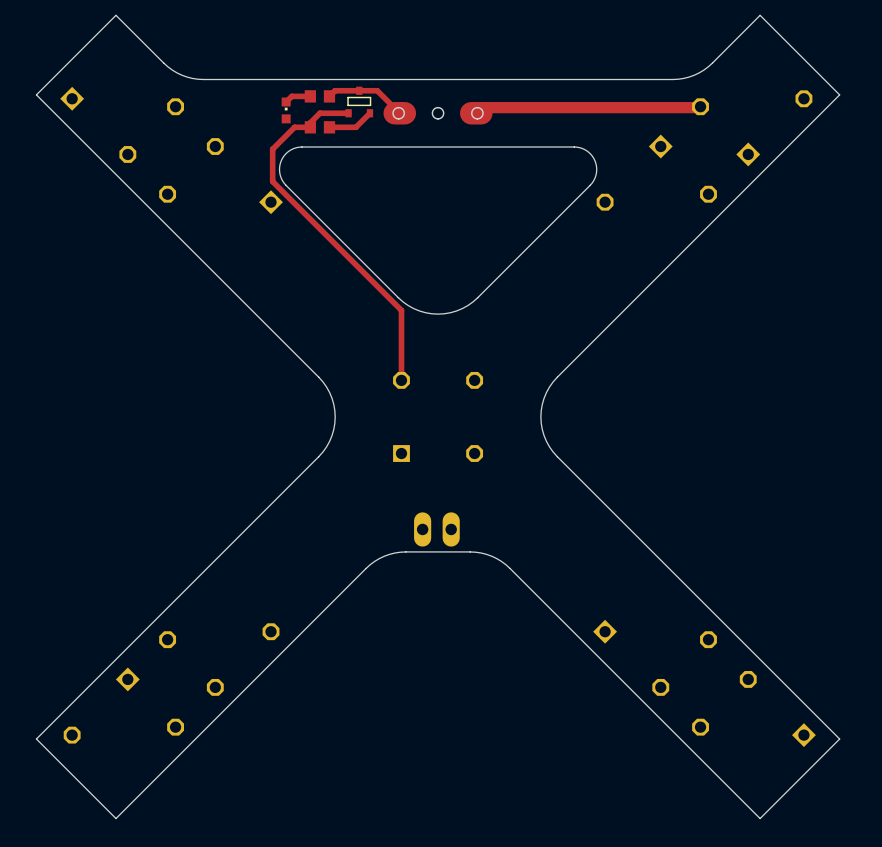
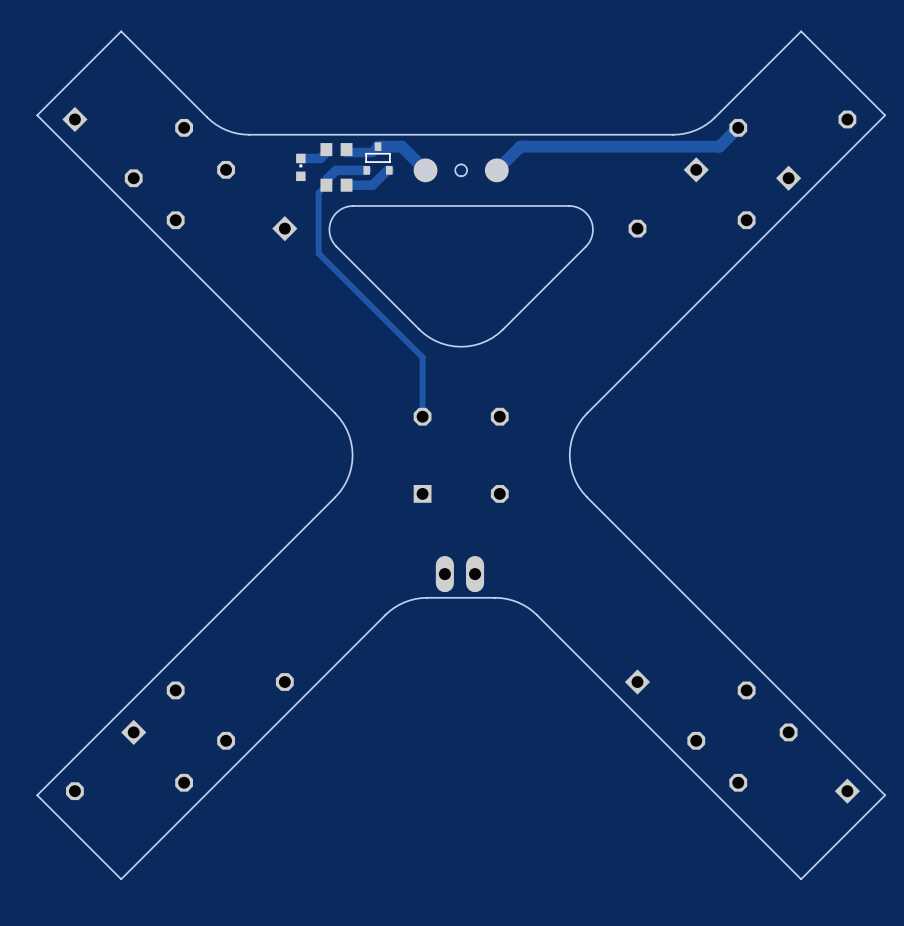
board edge: (115, 15) (172, 70) (187, 77) (203, 79) (678, 79) (694, 75) (708, 66) (760, 15) -> (121, 31) (211, 121) (231, 132) (249, 134) (684, 133) (695, 130) (710, 121) (801, 31)
track: (310, 96) (291, 96) (286, 102) -> none
part position: (319, 96) -> (336, 185)
track: (329, 96) (335, 90) (377, 90) (399, 113) -> none
part position: (359, 102) -> (378, 158)
track: (699, 107) (481, 107) (476, 113) -> (737, 128) (719, 146) (520, 146) (496, 170)
part position: (286, 110) -> (300, 167)
track: (348, 113) (319, 113) (310, 122) (310, 127) (294, 127) (272, 149) (272, 181) (401, 310) (401, 324) -> (366, 170) (335, 170) (327, 178) (327, 184) (318, 192) (318, 253) (422, 357)
track: (369, 113) (355, 127) (329, 127) -> none
part: (438, 113) -> none
track: none -> (326, 152) (320, 158) (300, 158)
track: none -> (346, 152) (372, 152) (378, 146) (401, 146) (425, 170)
track: none -> (389, 170) (372, 185) (346, 185)
part: none -> (461, 170)
board edge: (398, 297) (284, 183) (280, 175) (279, 166) (282, 158) (288, 151) (301, 147) (574, 147) (586, 150) (592, 156) (596, 165) (596, 173) (591, 183) (477, 297) -> (419, 329) (334, 244) (330, 235) (329, 226) (332, 217) (338, 210) (353, 205) (569, 205) (581, 209) (588, 215) (592, 223) (592, 232) (589, 241) (503, 329)

